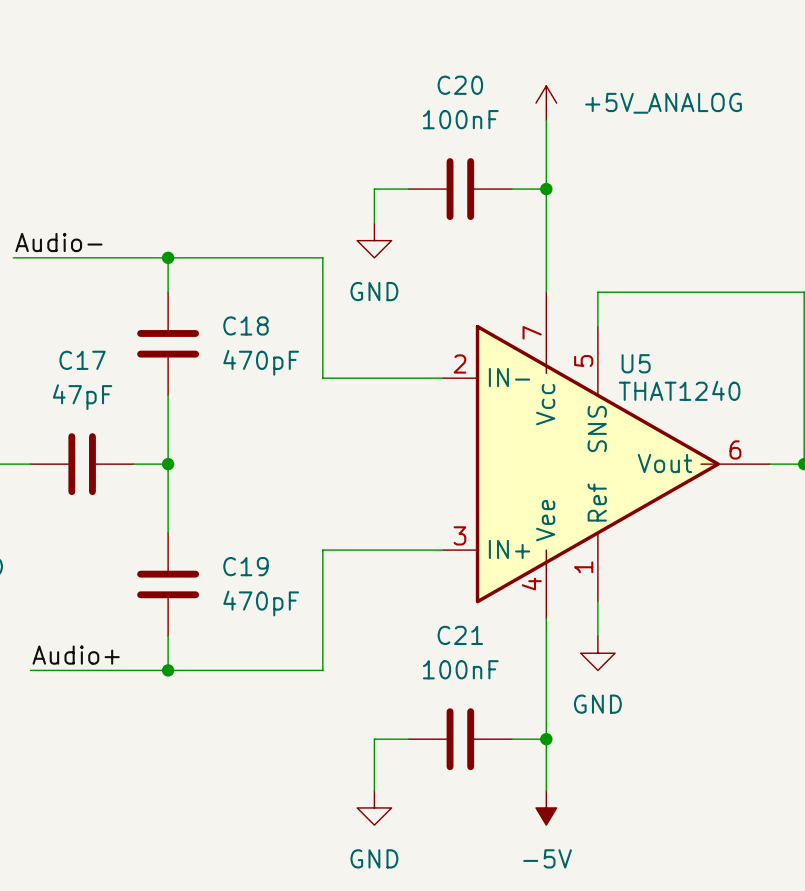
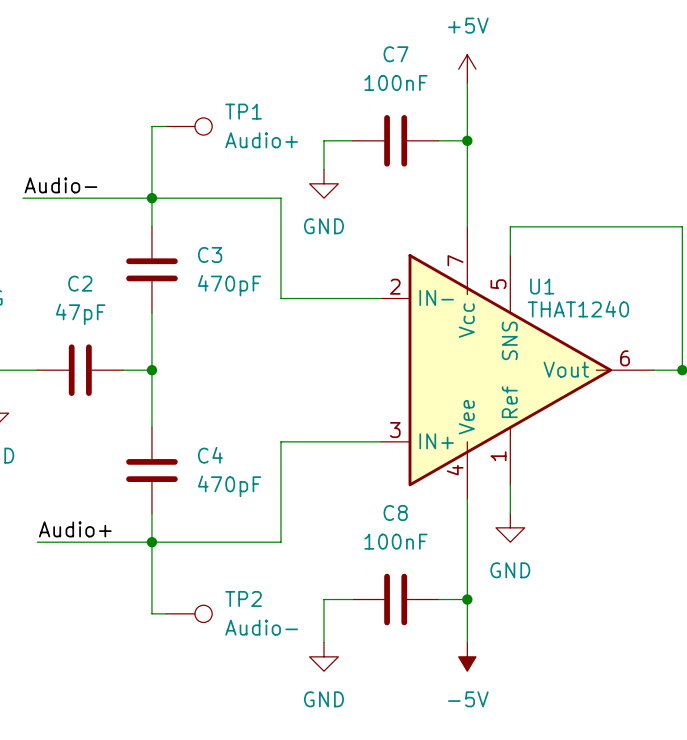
C20 name: C20 (460, 85) -> C7 (395, 54)
power symbol: +5V_ANALOG (546, 103) -> +5V (467, 69)
wire: none -> (166, 126) (151, 126) (151, 198)
TP1: none -> Audio+ (189, 126)
C18 name: C18 (246, 325) -> C3 (210, 254)
C17 name: C17 (82, 360) -> C2 (80, 283)
U5 name: U5 (636, 363) -> U1 (542, 286)
C19 name: C19 (246, 566) -> C4 (210, 455)
C21 name: C21 (460, 635) -> C8 (395, 512)
wire: none -> (151, 542) (151, 613) (166, 613)
TP2: none -> Audio- (189, 613)

